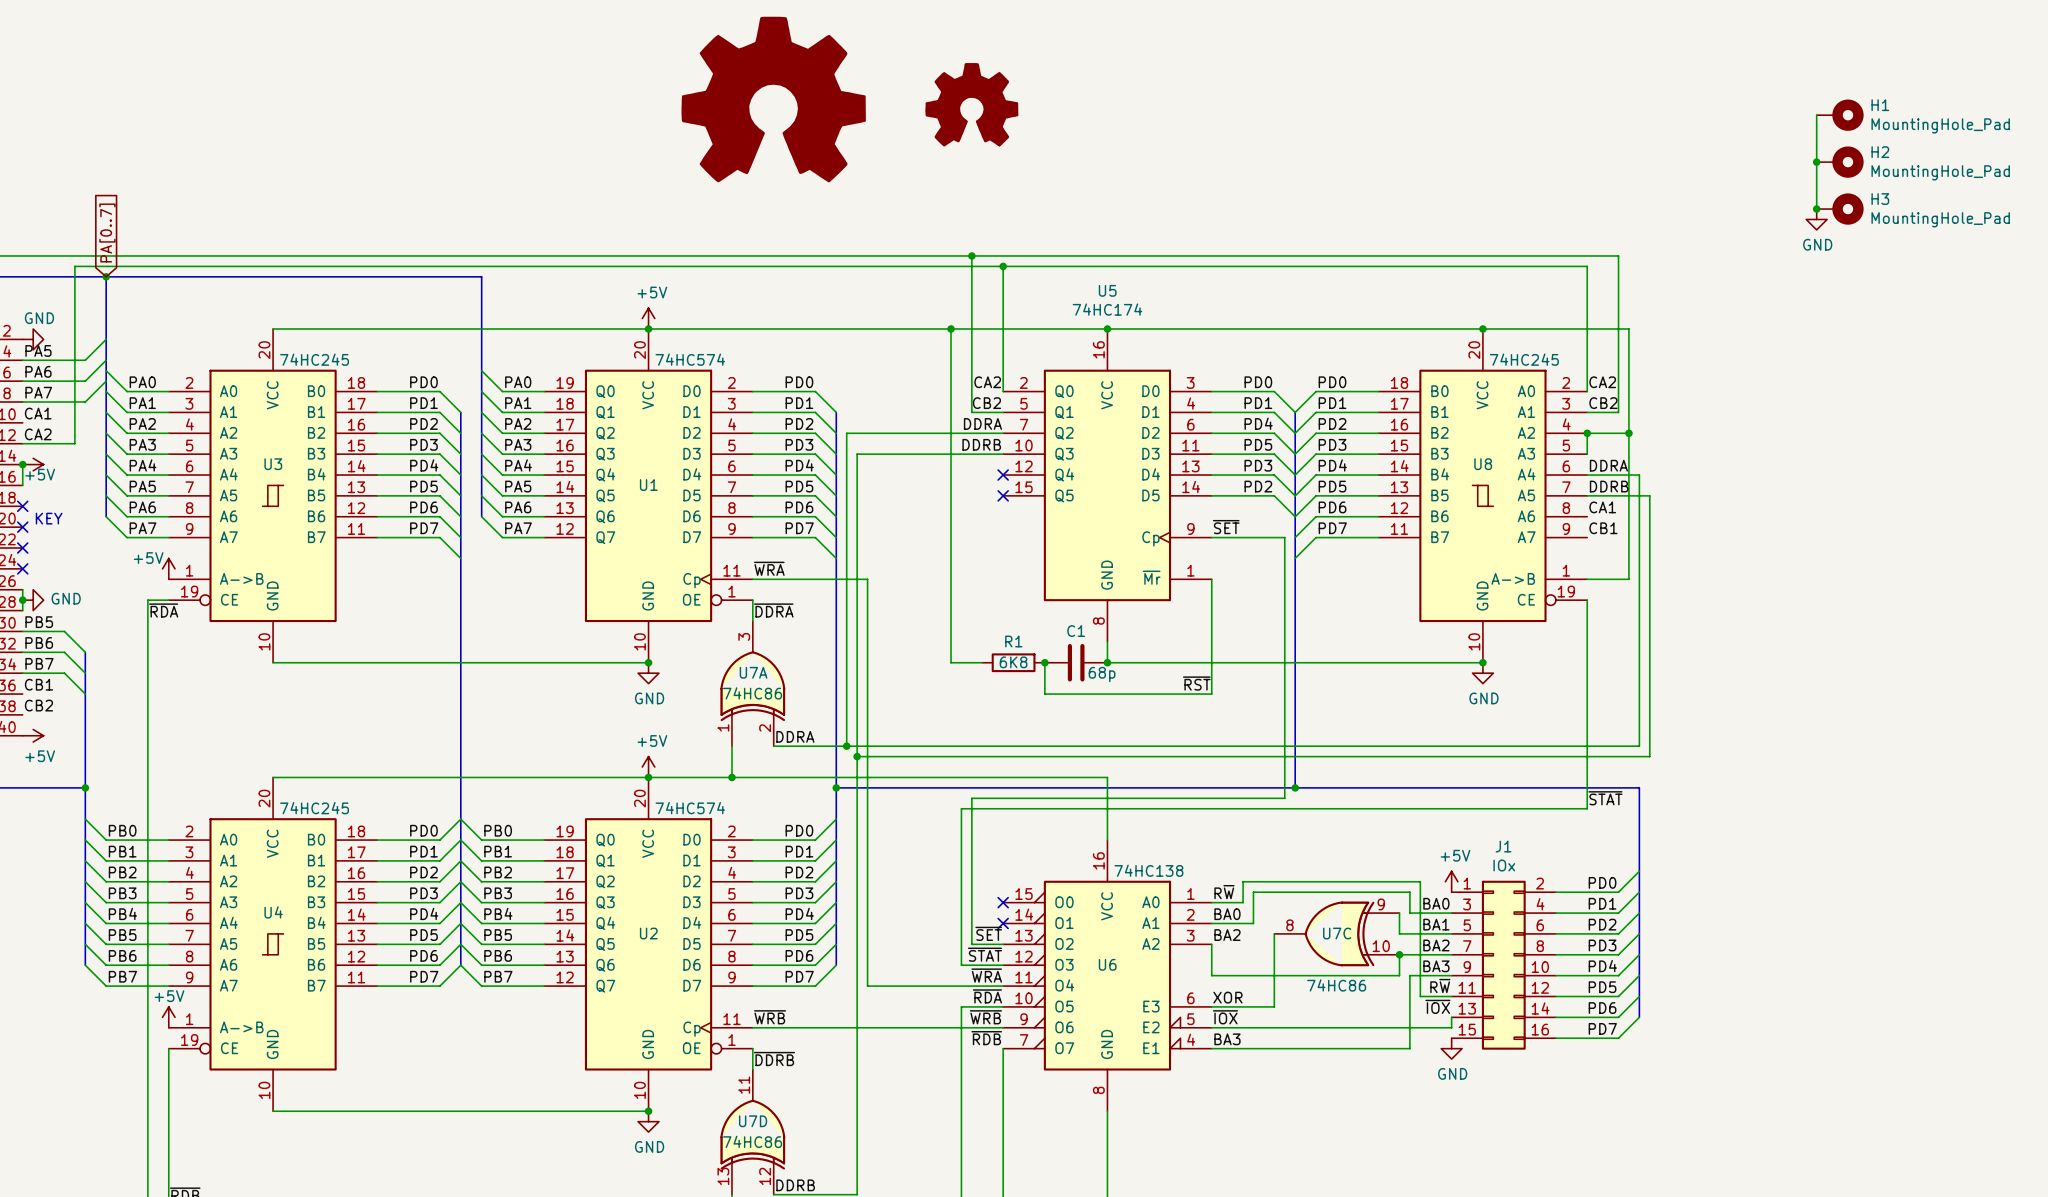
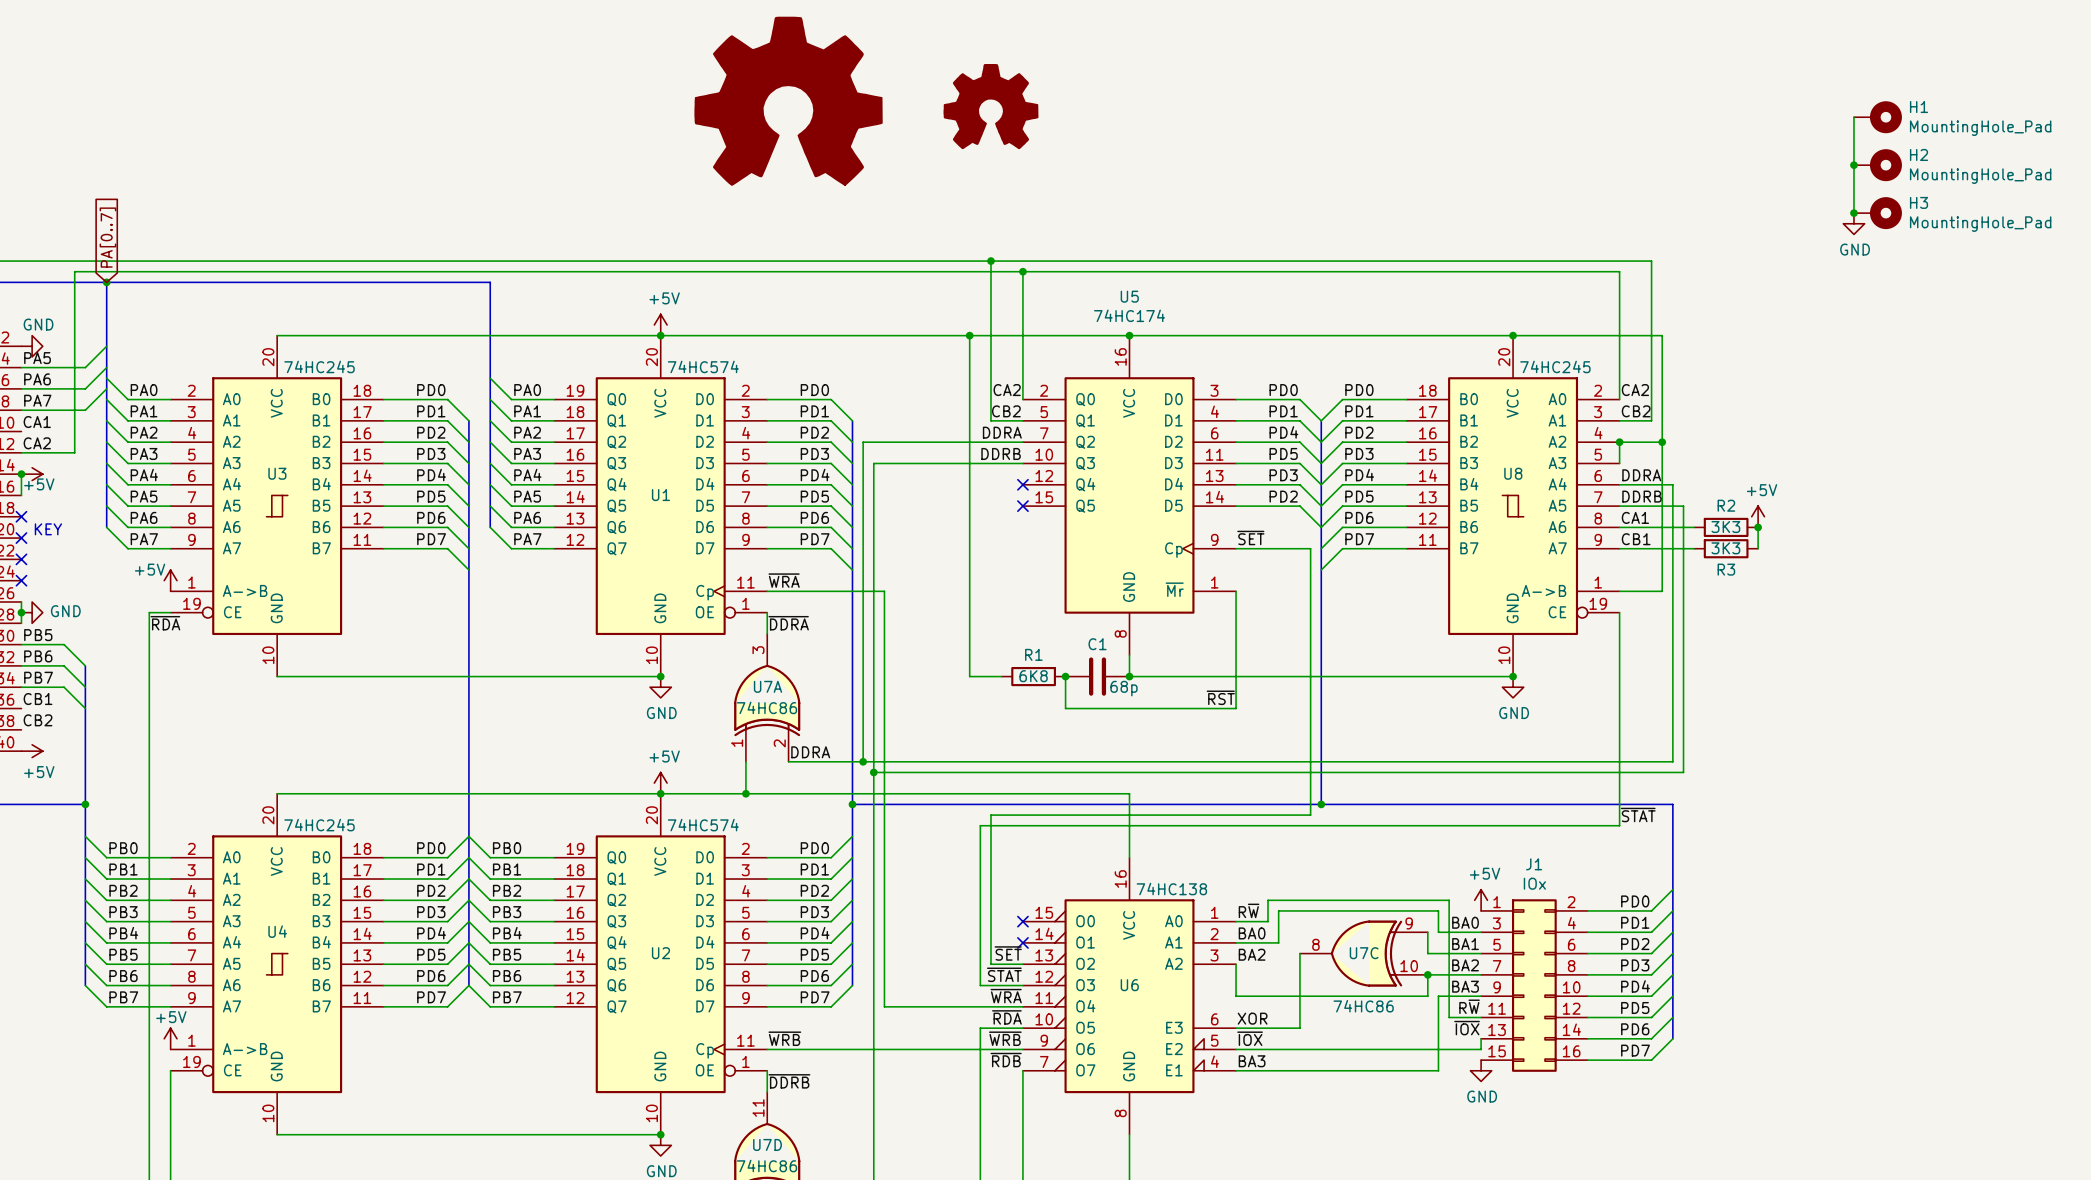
power symbol: none -> +5V (1758, 516)
wire: none -> (1619, 527) (1694, 527)
R2: none -> 3K3 (1726, 527)
wire: none -> (1758, 527) (1758, 548)
junction: none -> (1758, 527)
wire: none -> (1619, 548) (1694, 548)
R3: none -> 3K3 (1726, 548)

